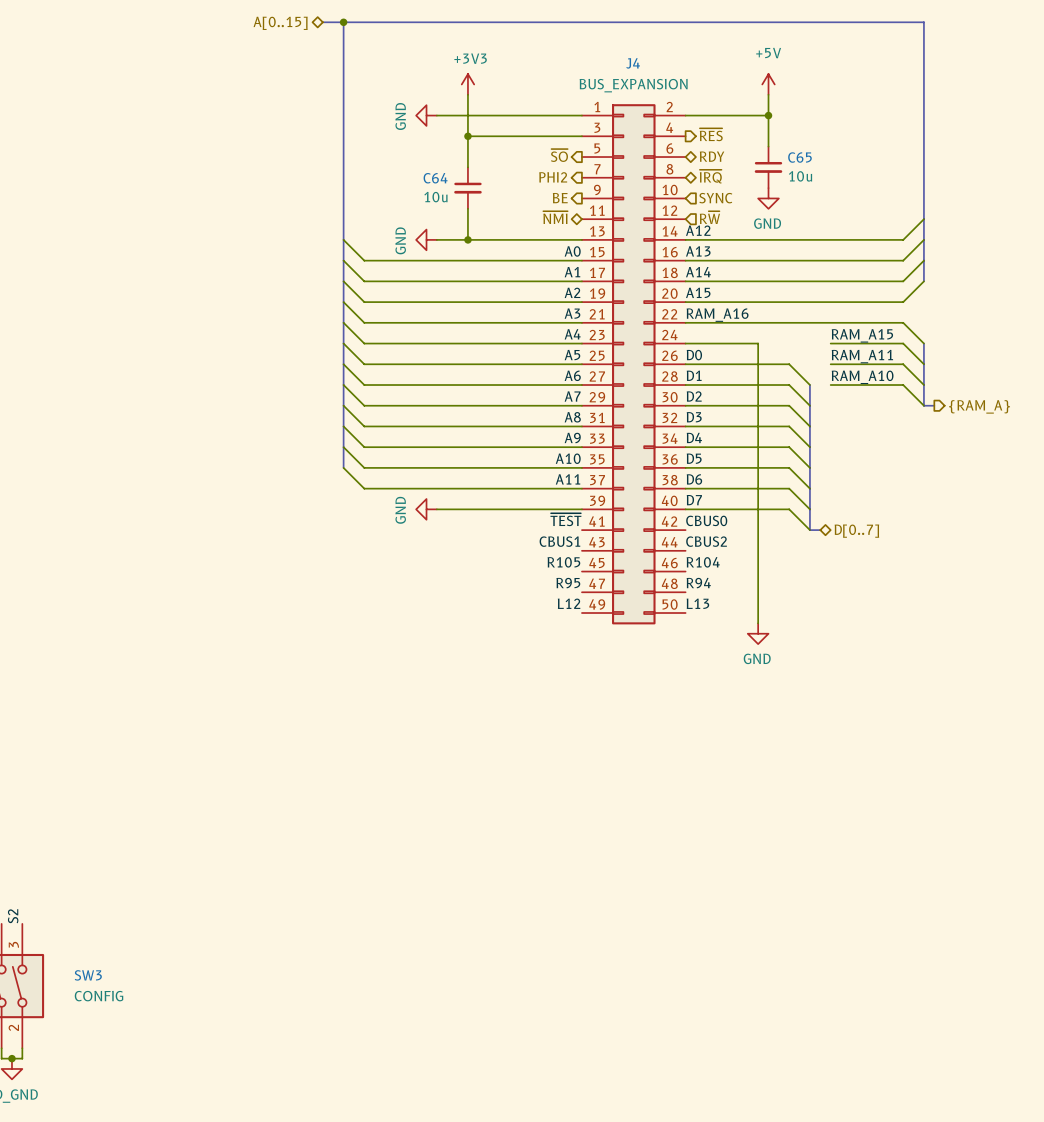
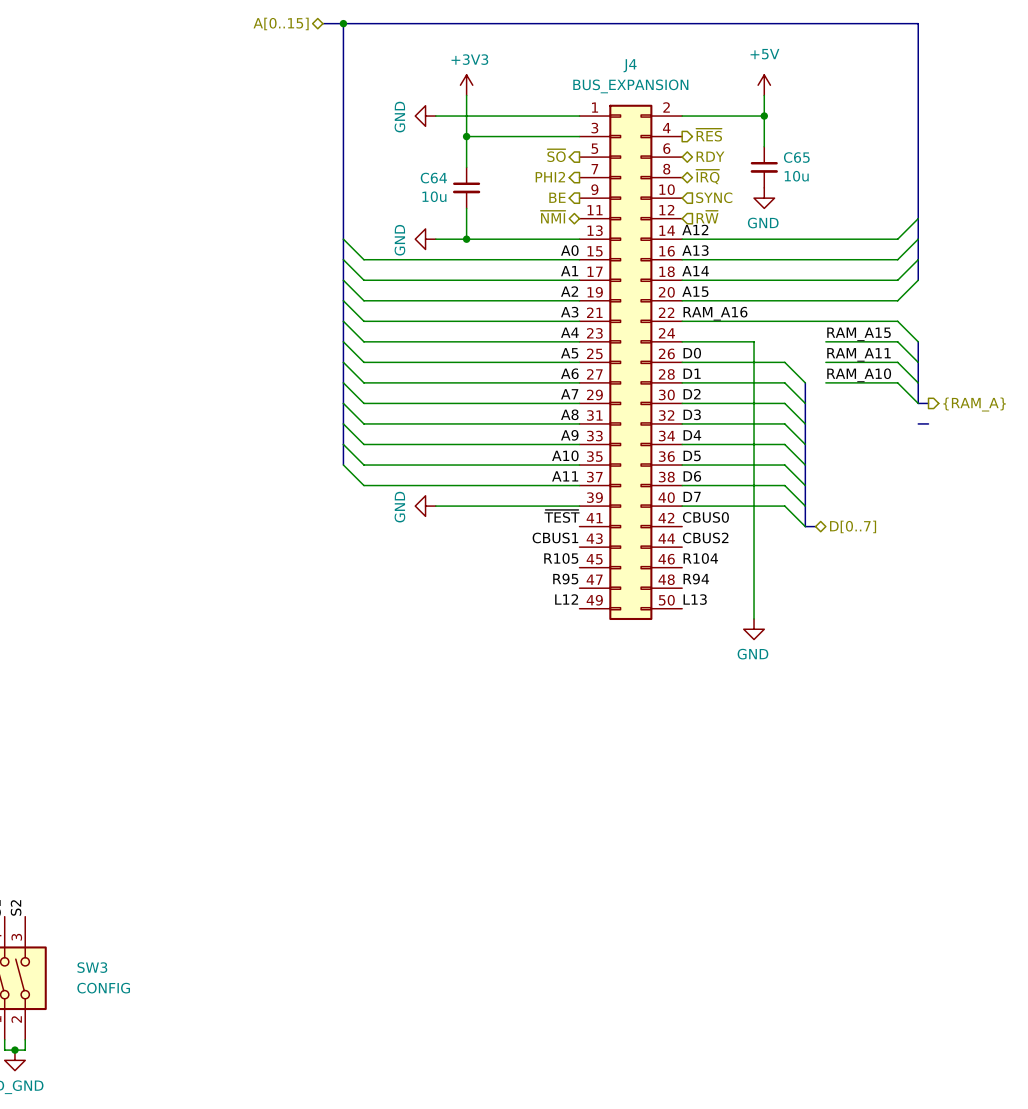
bus: none -> (918, 423) (928, 423)

